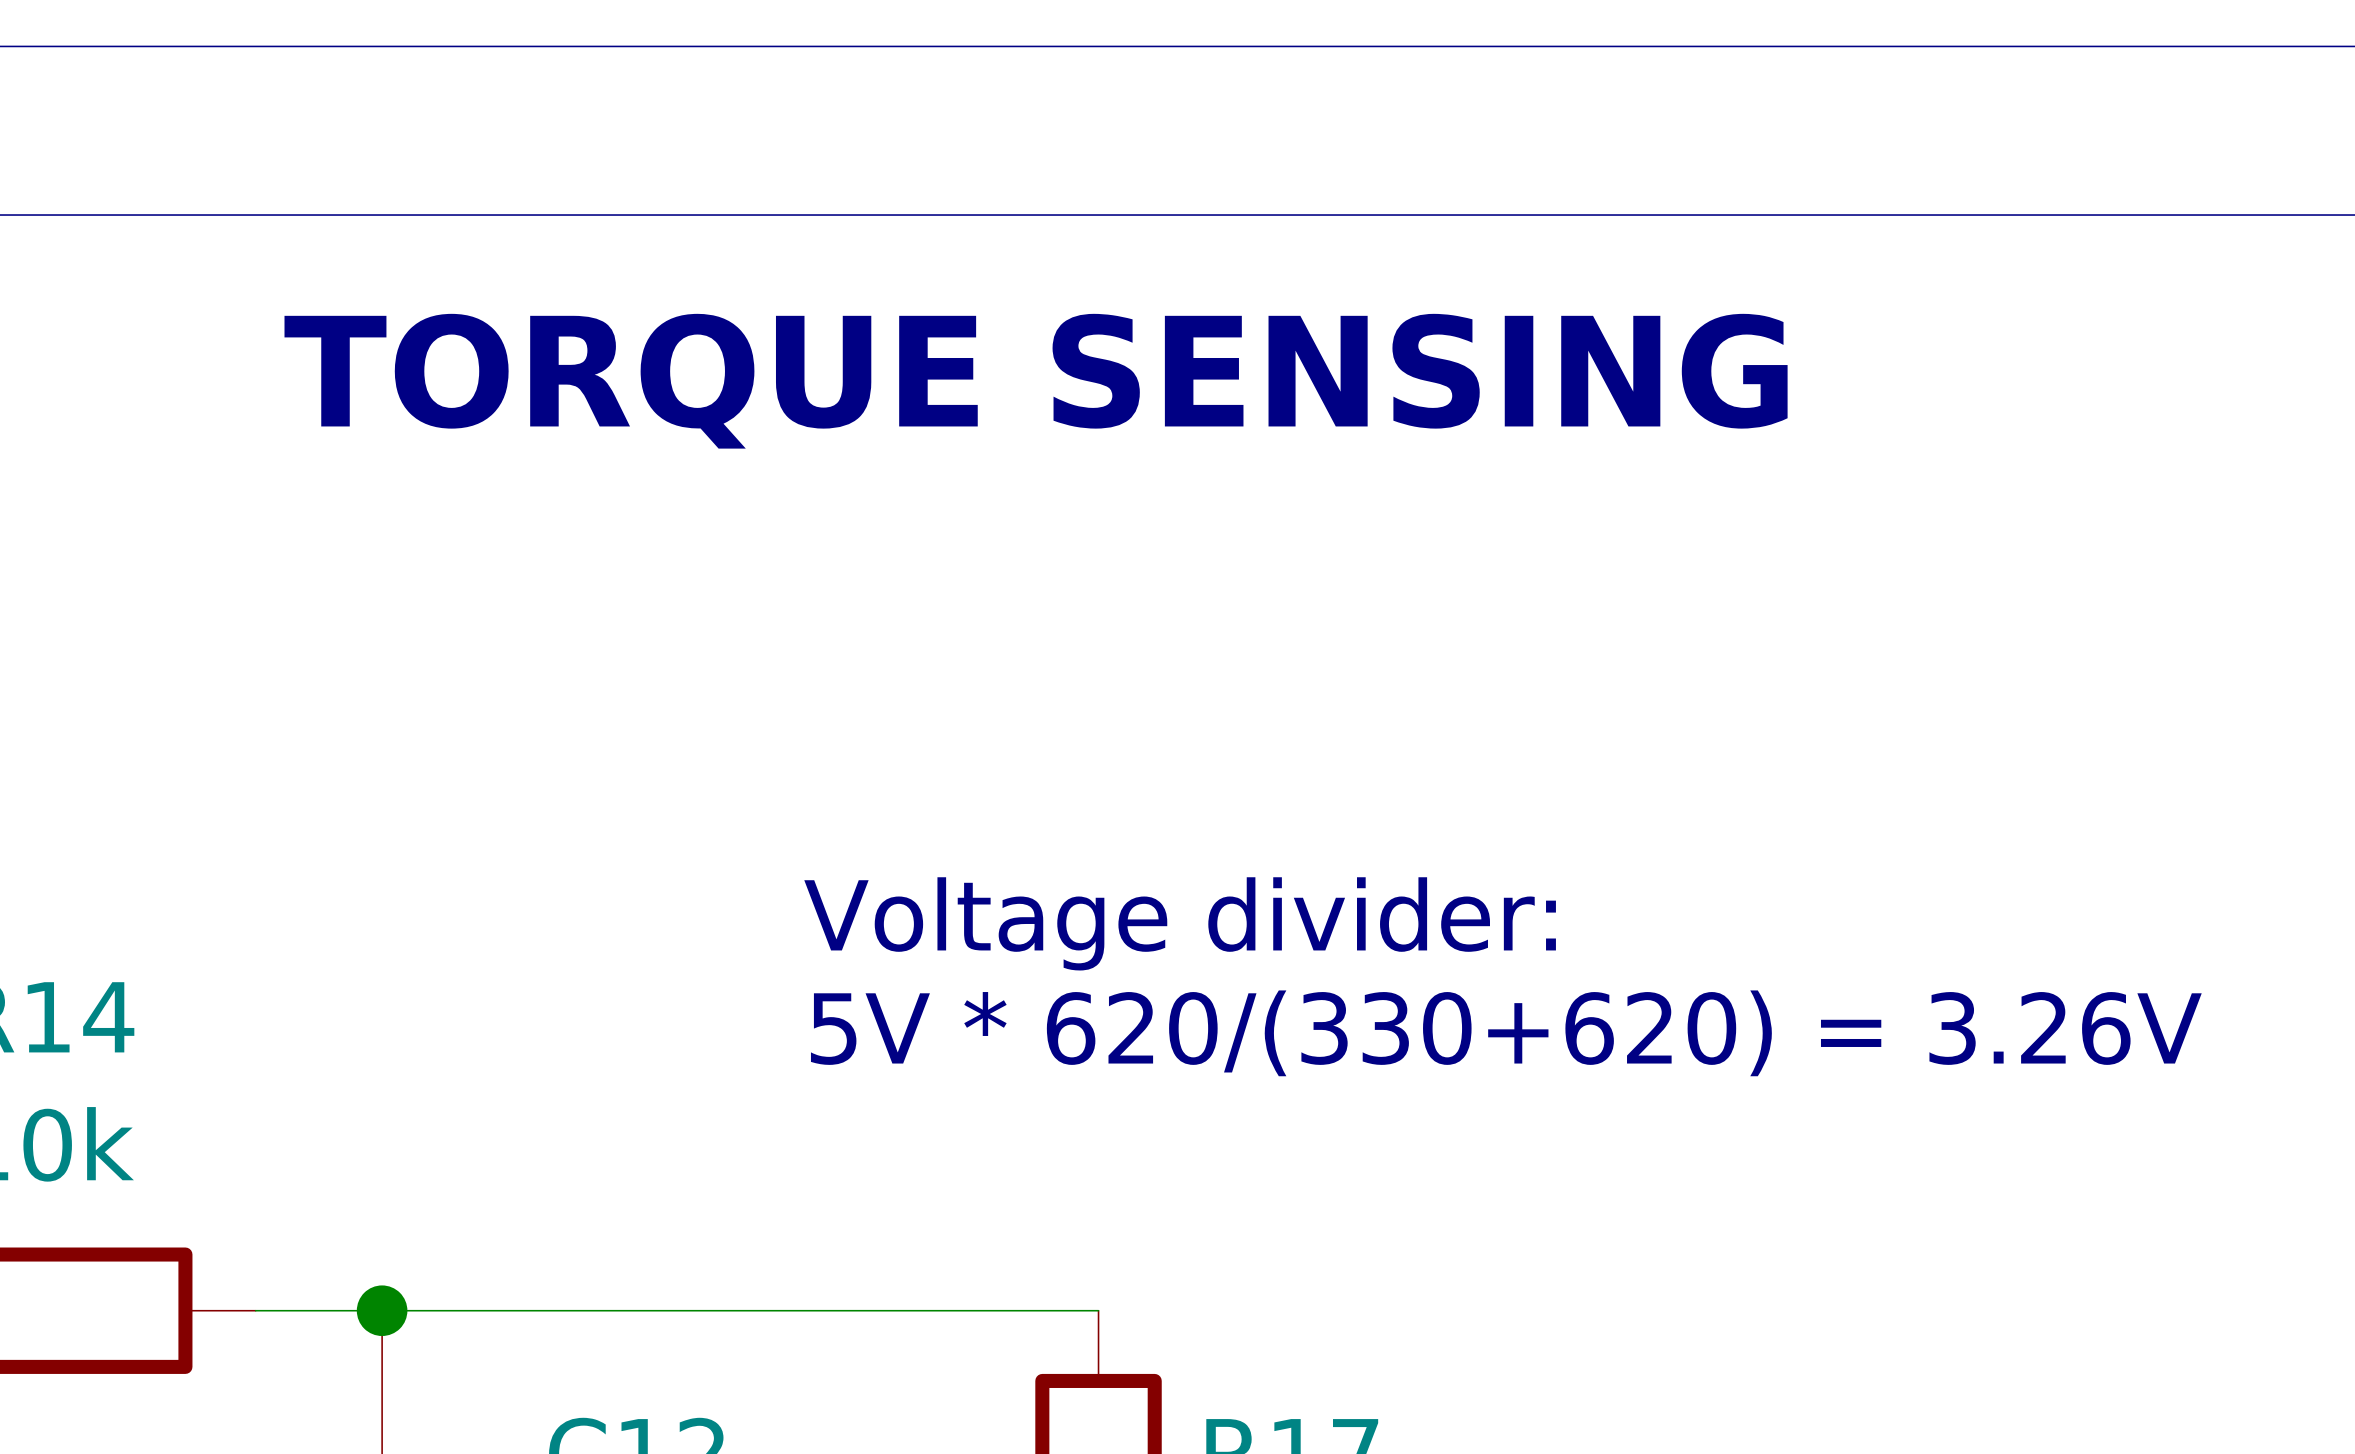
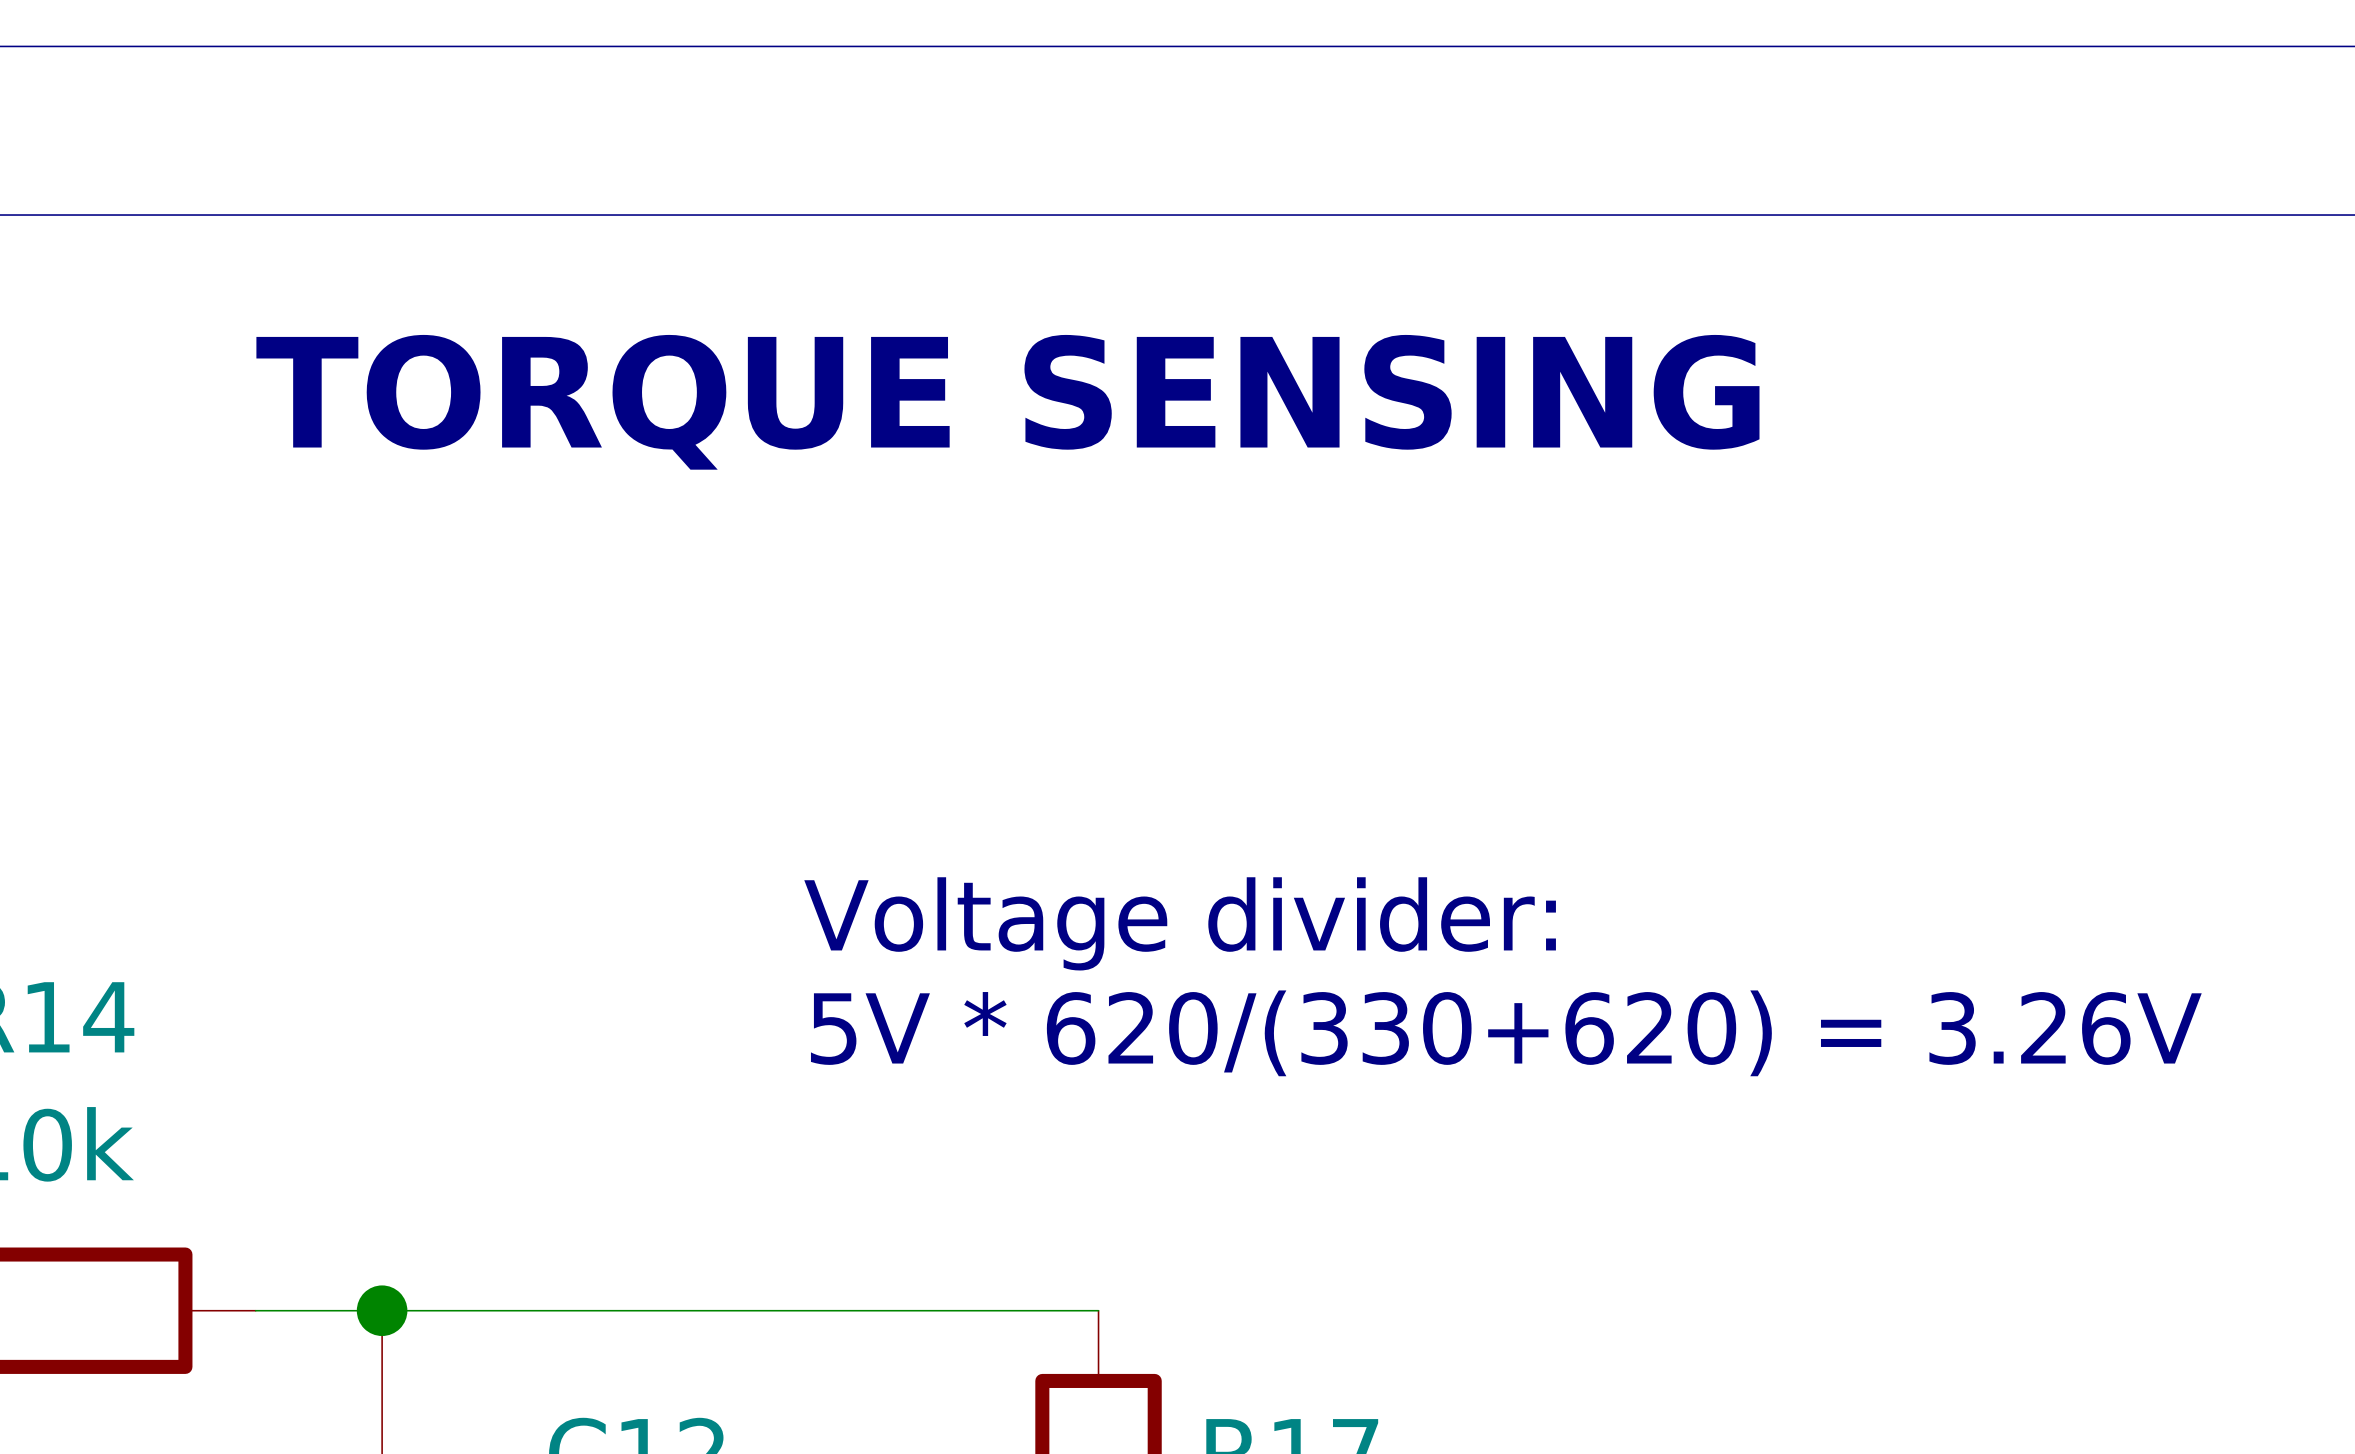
text position: TORQUE SENSING (1036, 381) -> TORQUE SENSING (1007, 402)

